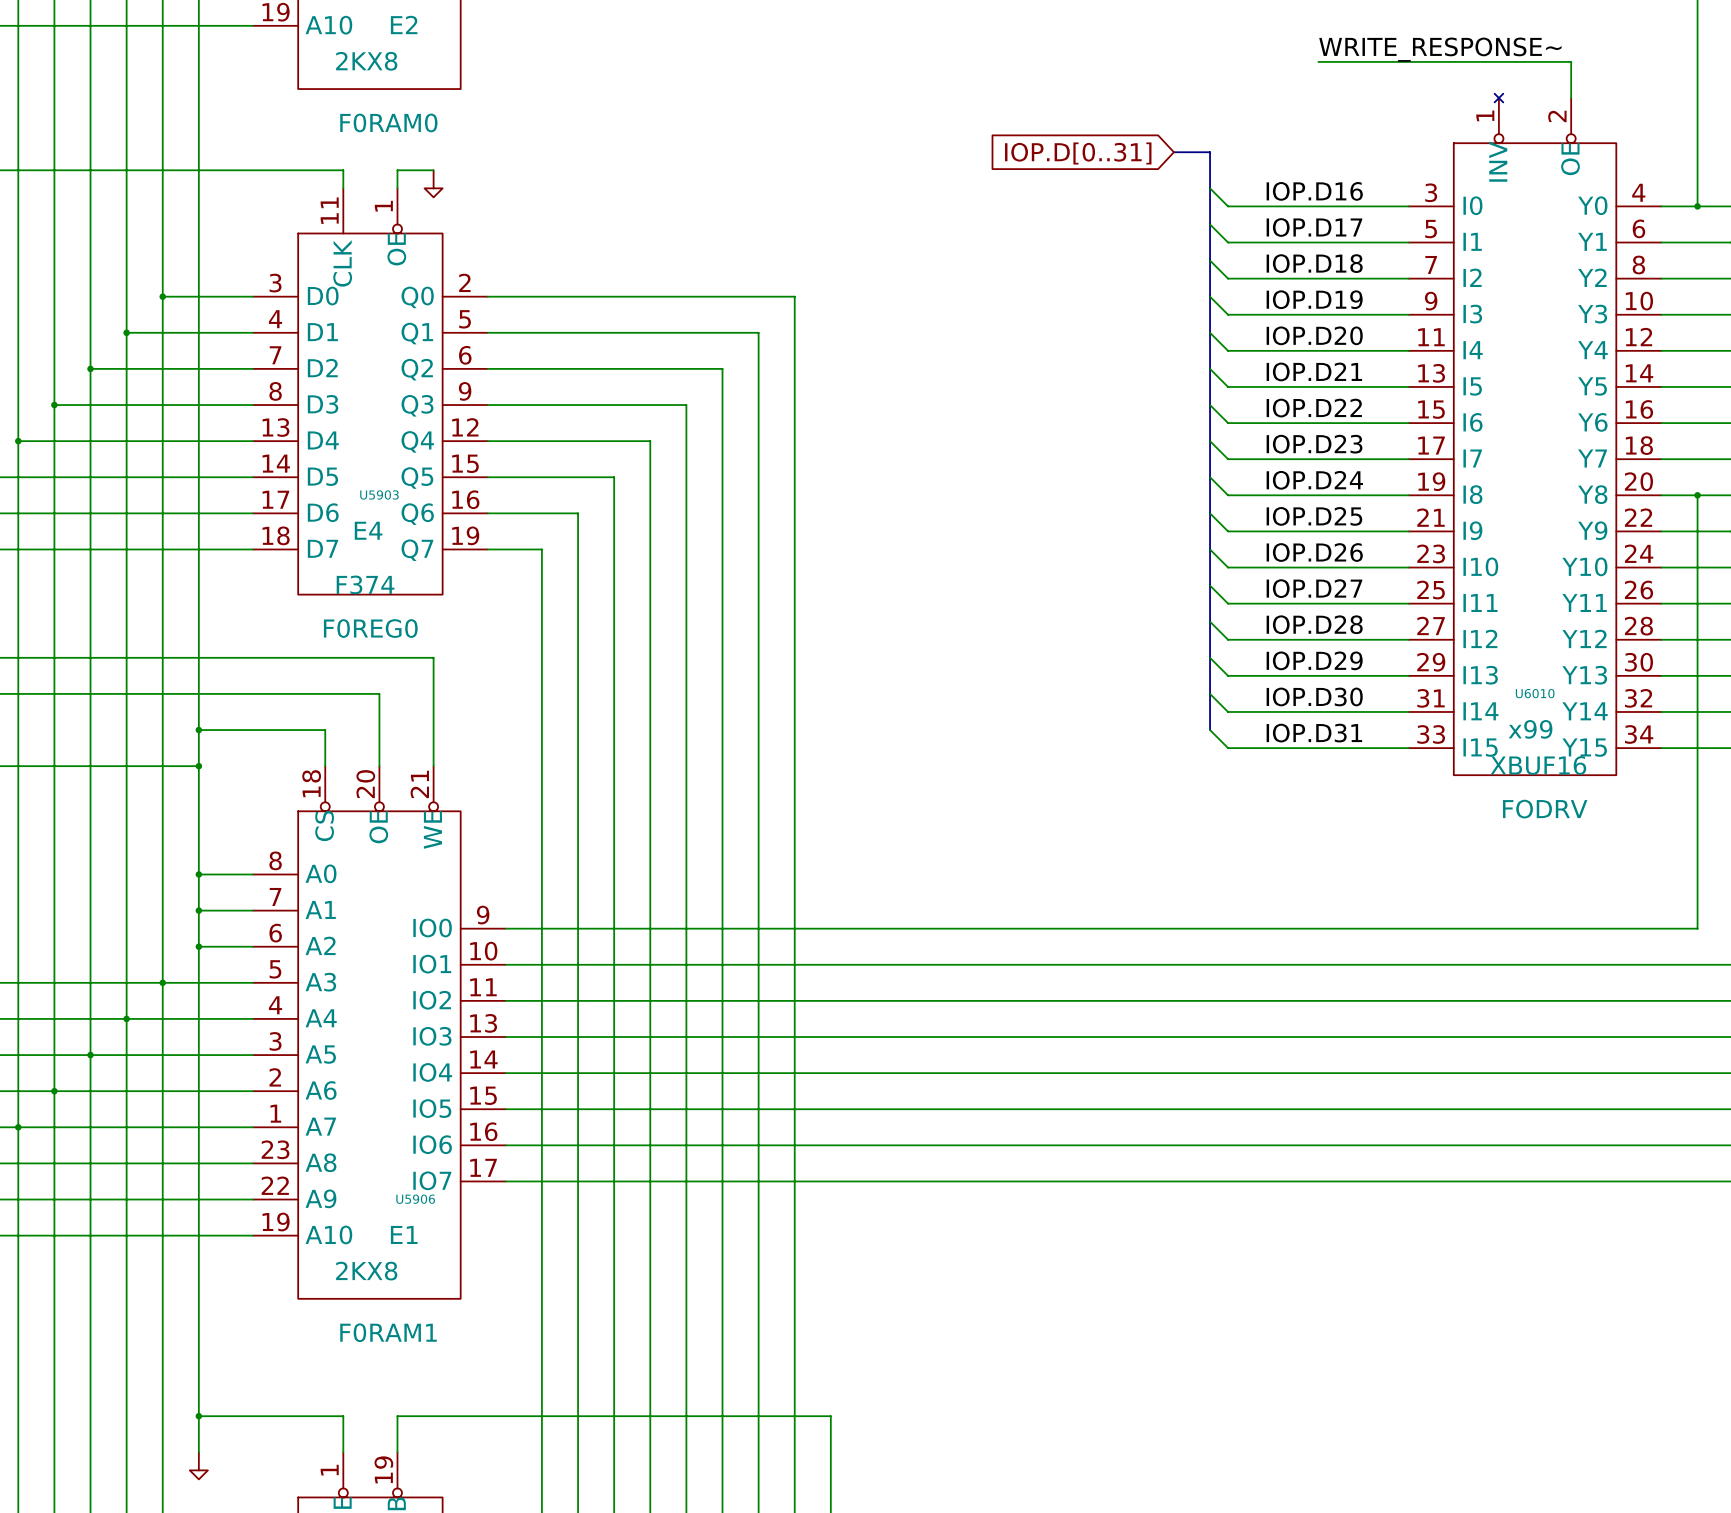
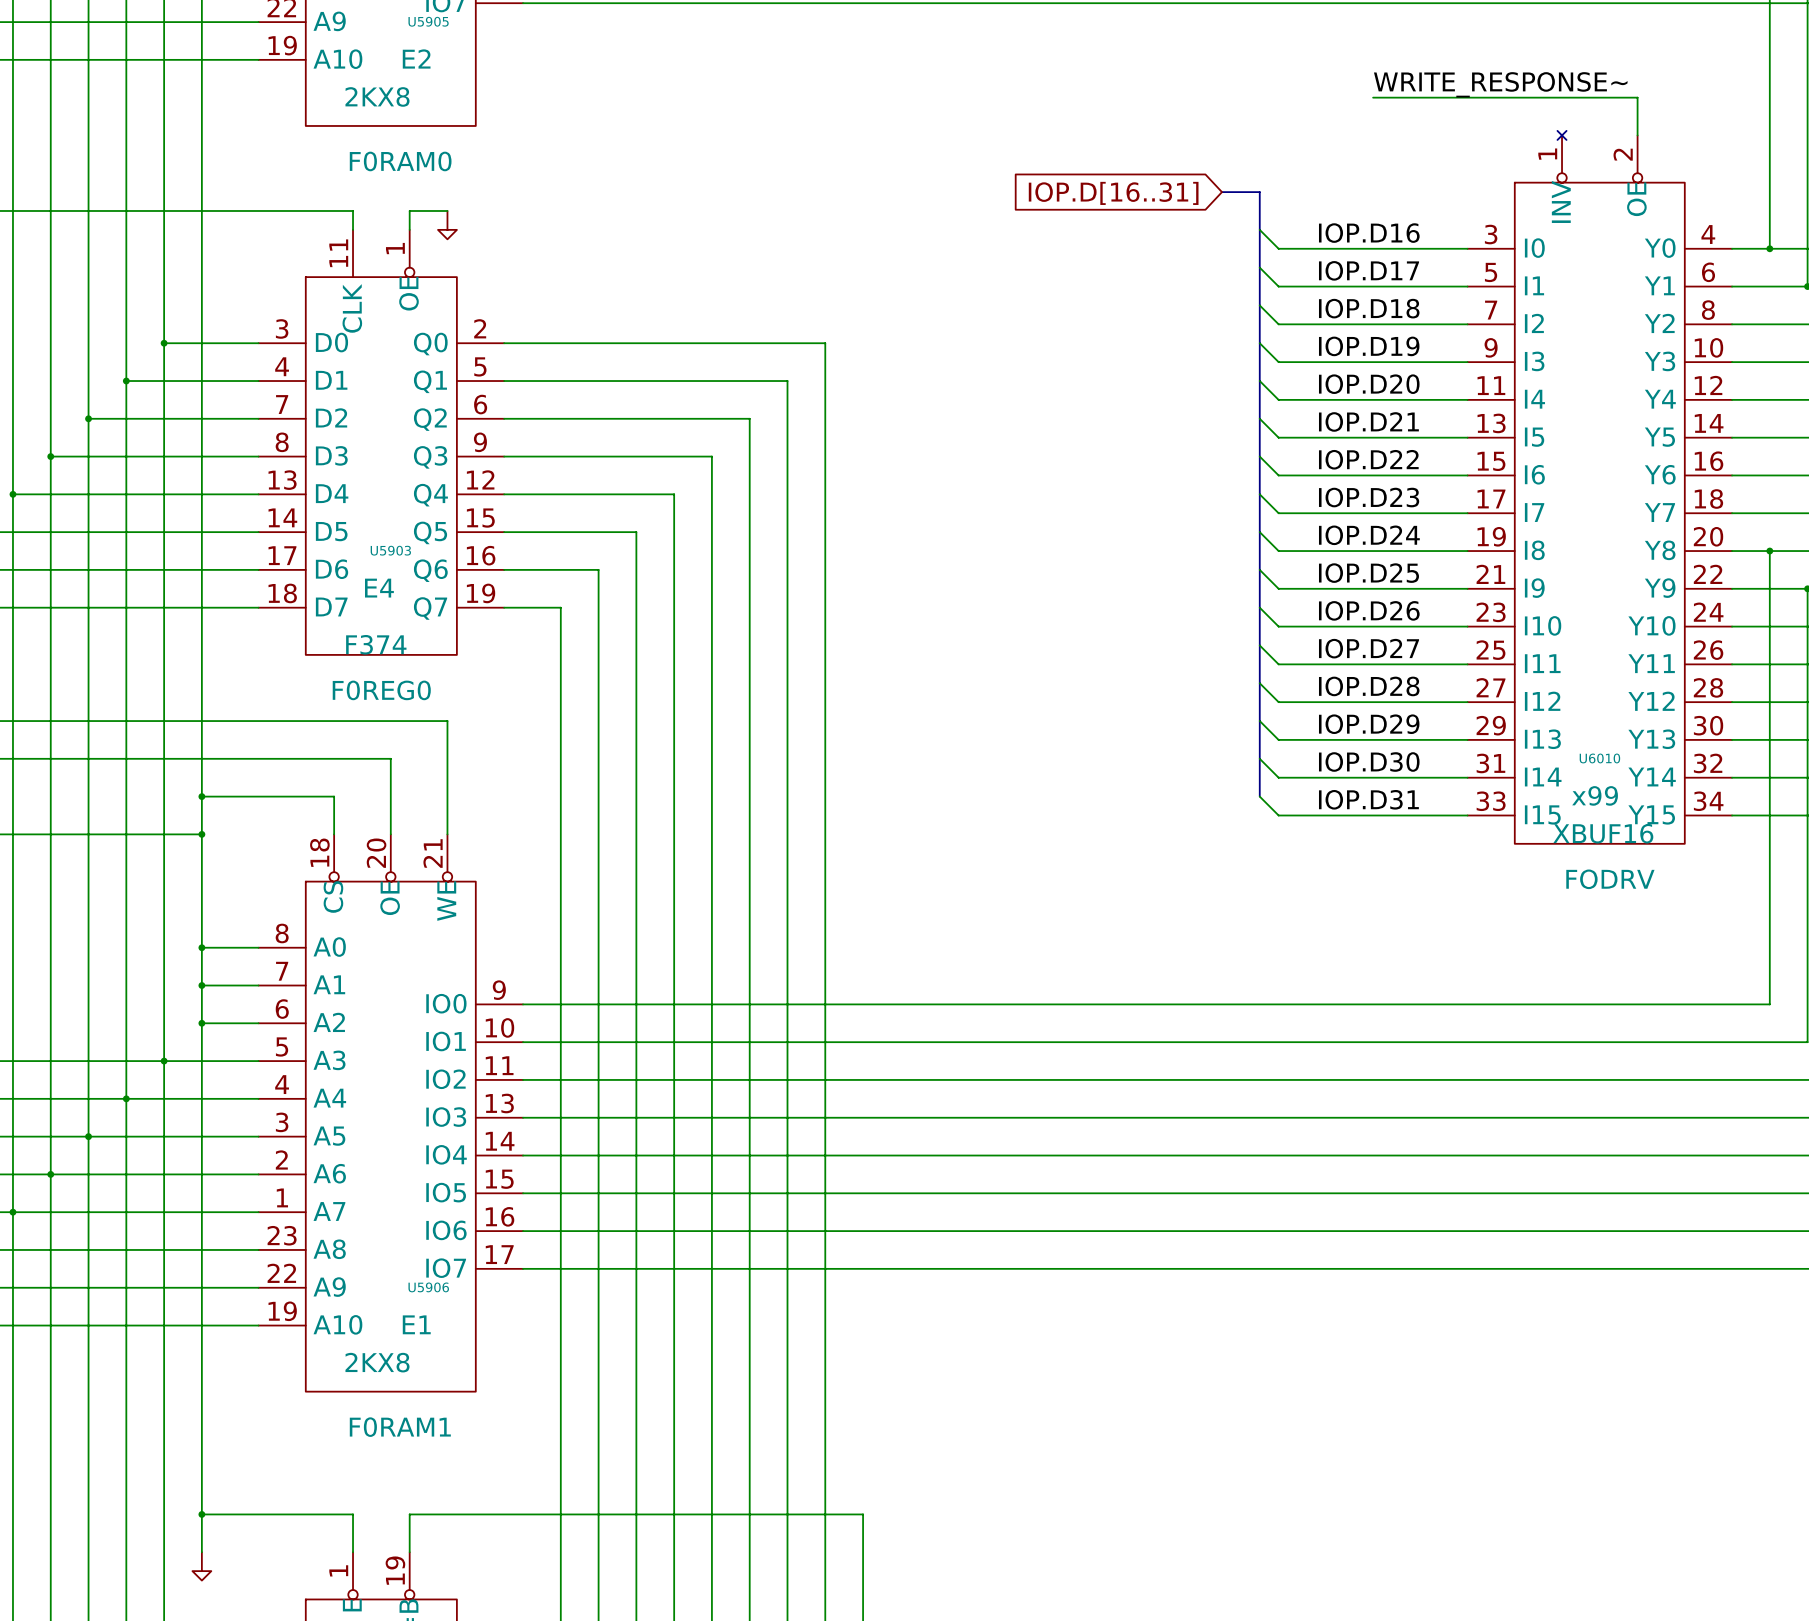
global label: IOP.D[0..31] (1078, 153) -> IOP.D[16..31] (1113, 193)

